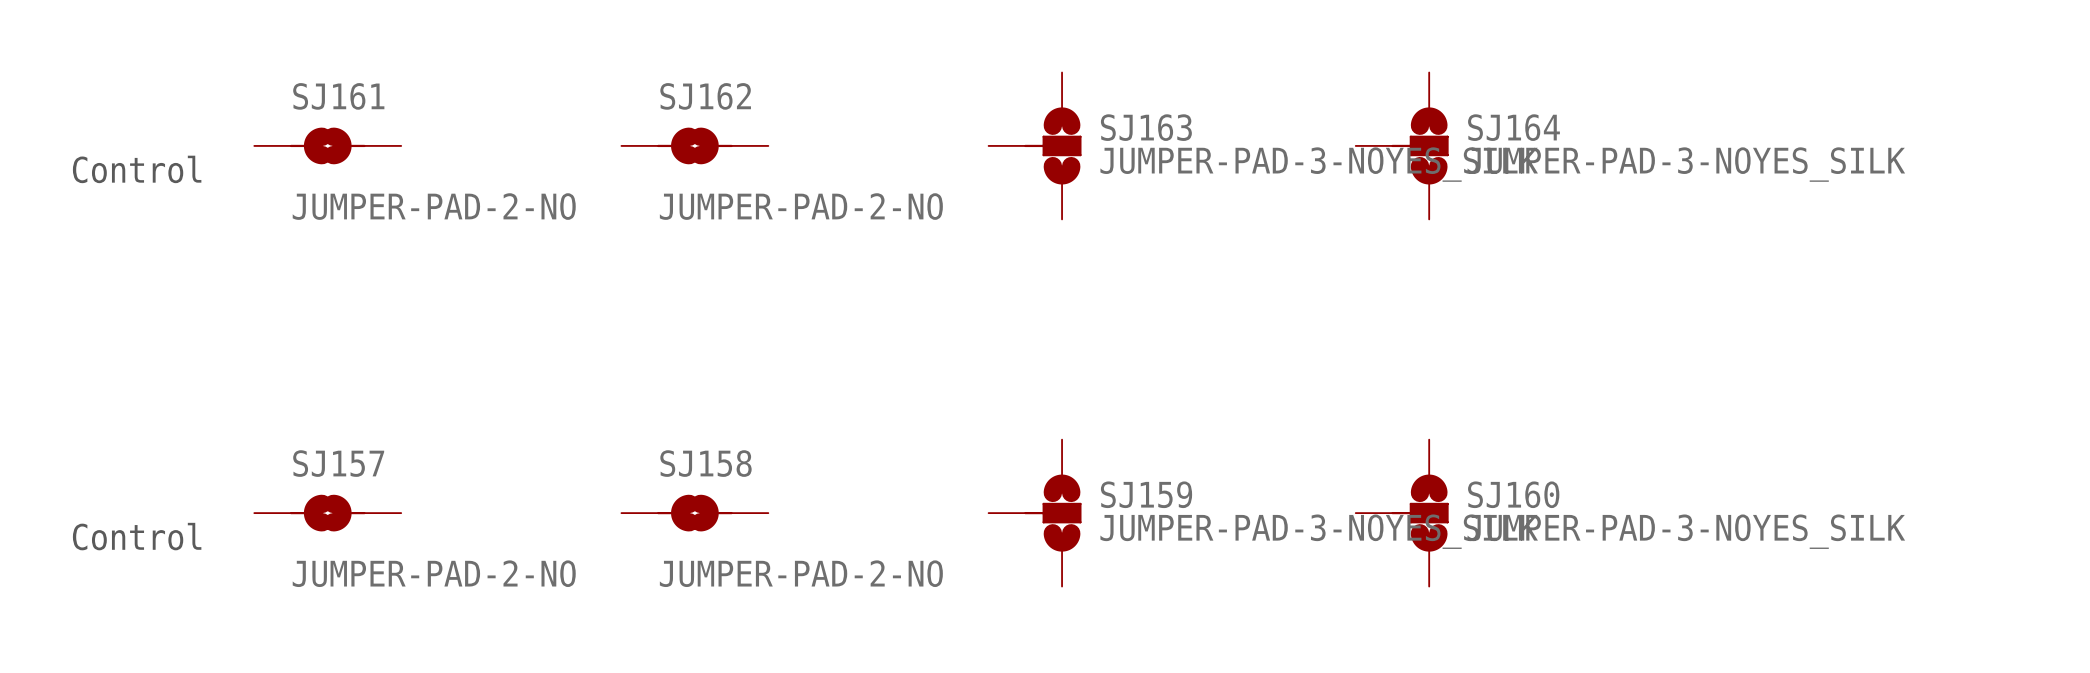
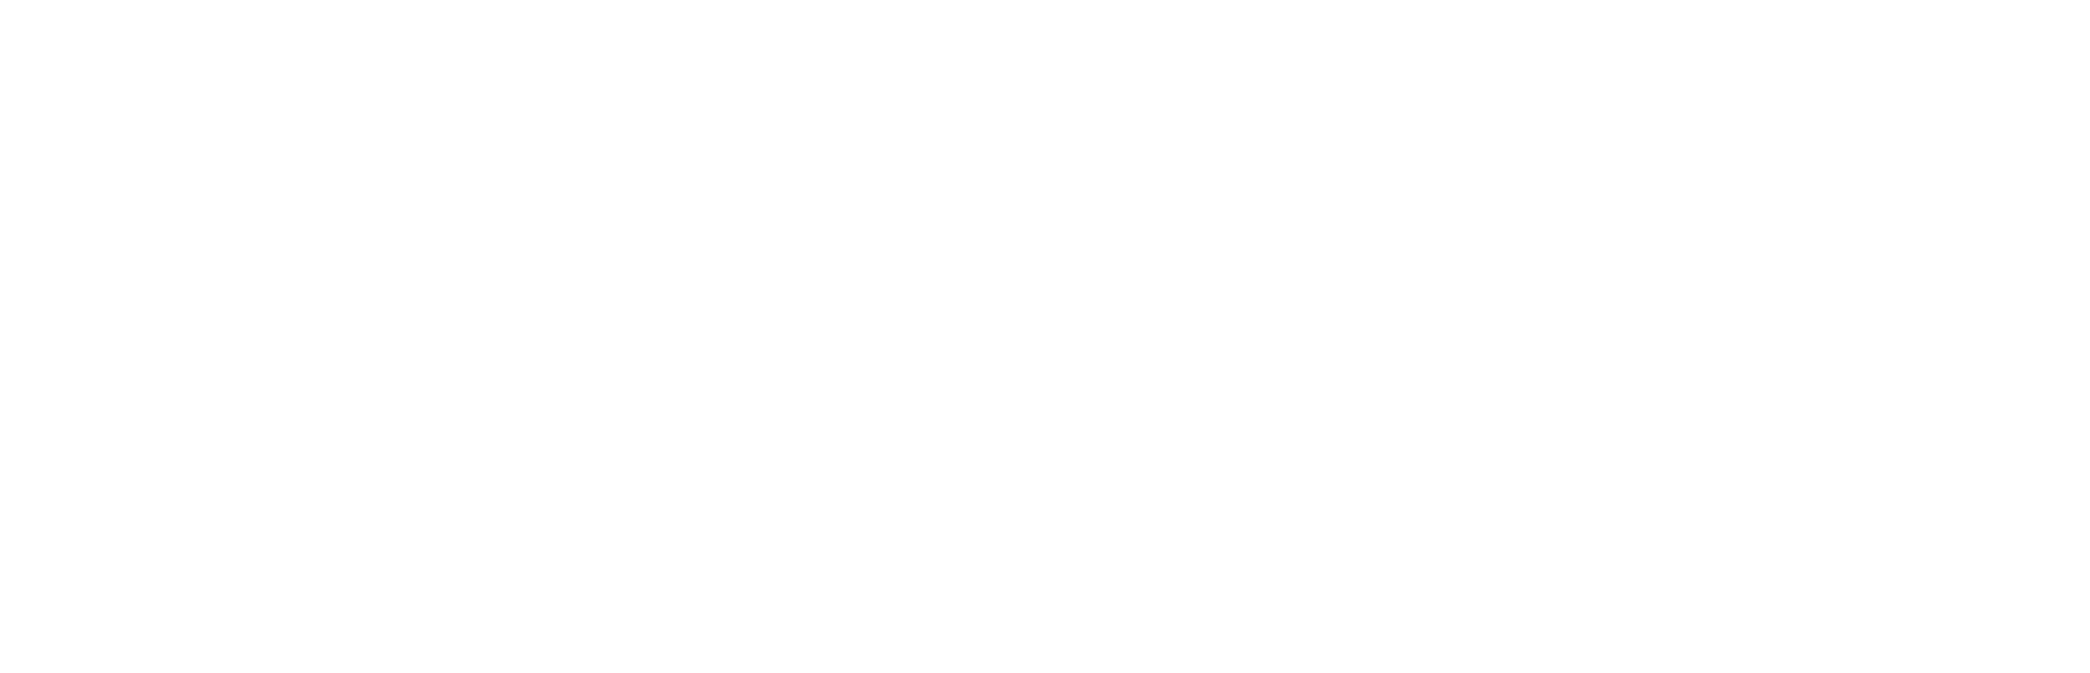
SJ161: JUMPER-PAD-2-NO (327, 145) -> none
SJ162: JUMPER-PAD-2-NO (694, 145) -> none
SJ163: JUMPER-PAD-3-NOYES_SILK (1035, 145) -> none
SJ164: JUMPER-PAD-3-NOYES_SILK (1402, 145) -> none
text: Control (137, 169) -> none
SJ157: JUMPER-PAD-2-NO (327, 513) -> none
SJ158: JUMPER-PAD-2-NO (694, 513) -> none
SJ159: JUMPER-PAD-3-NOYES_SILK (1035, 513) -> none
SJ160: JUMPER-PAD-3-NOYES_SILK (1402, 513) -> none
text: Control (137, 536) -> none

